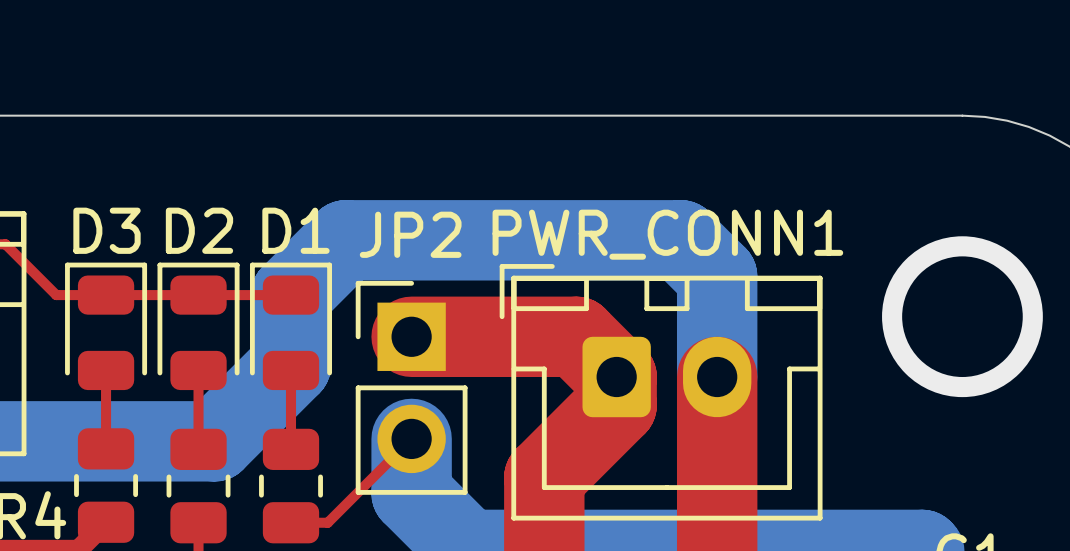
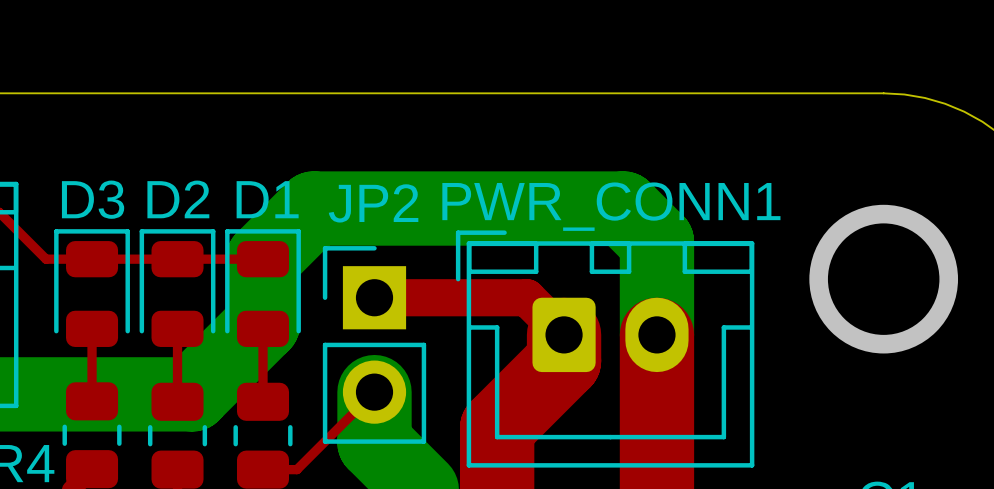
top track width: thick (411, 336) (576, 336) (616, 377) -> thin (374, 297) (526, 297) (564, 334)

